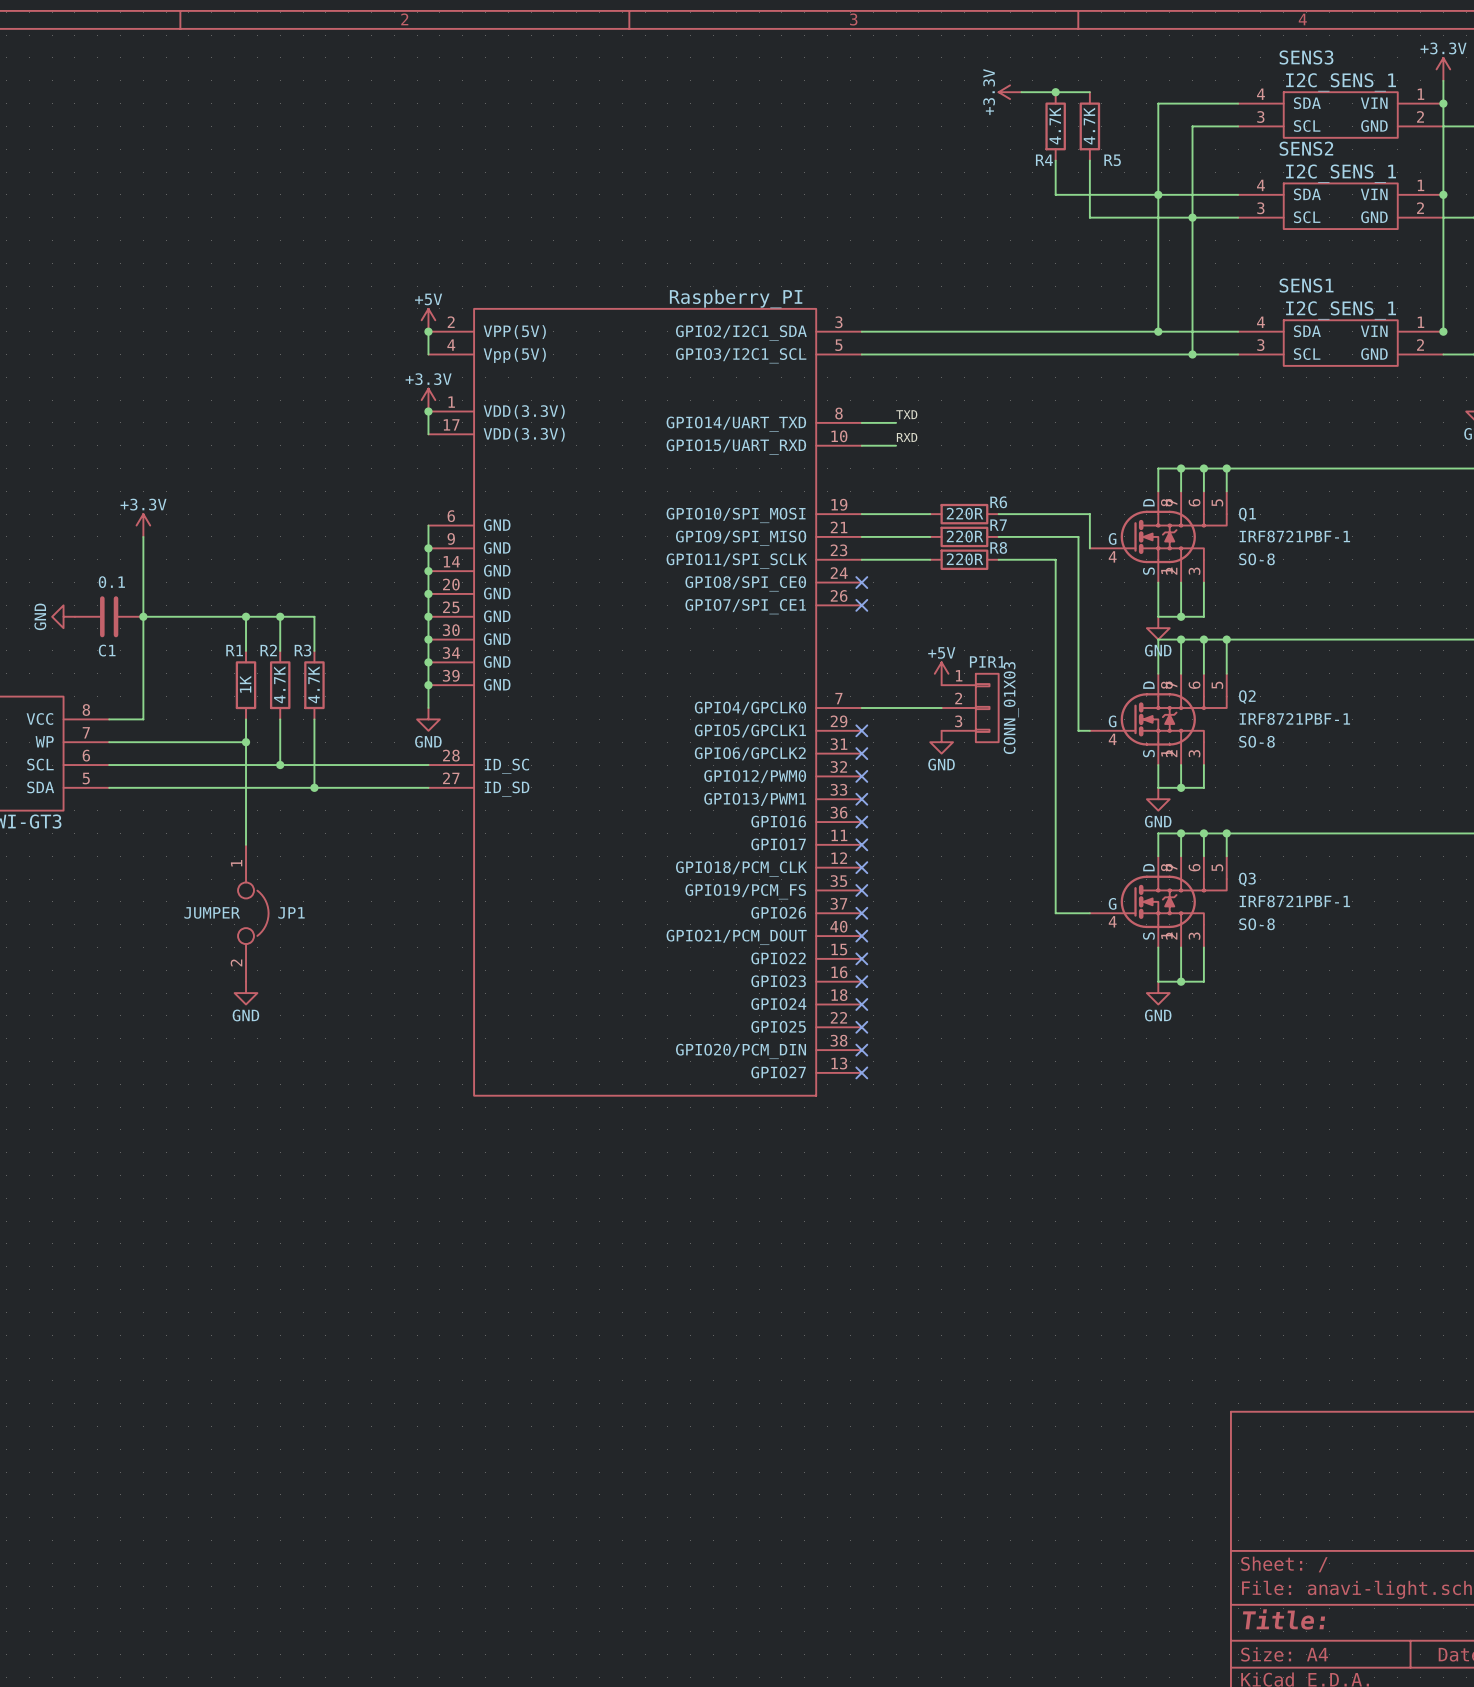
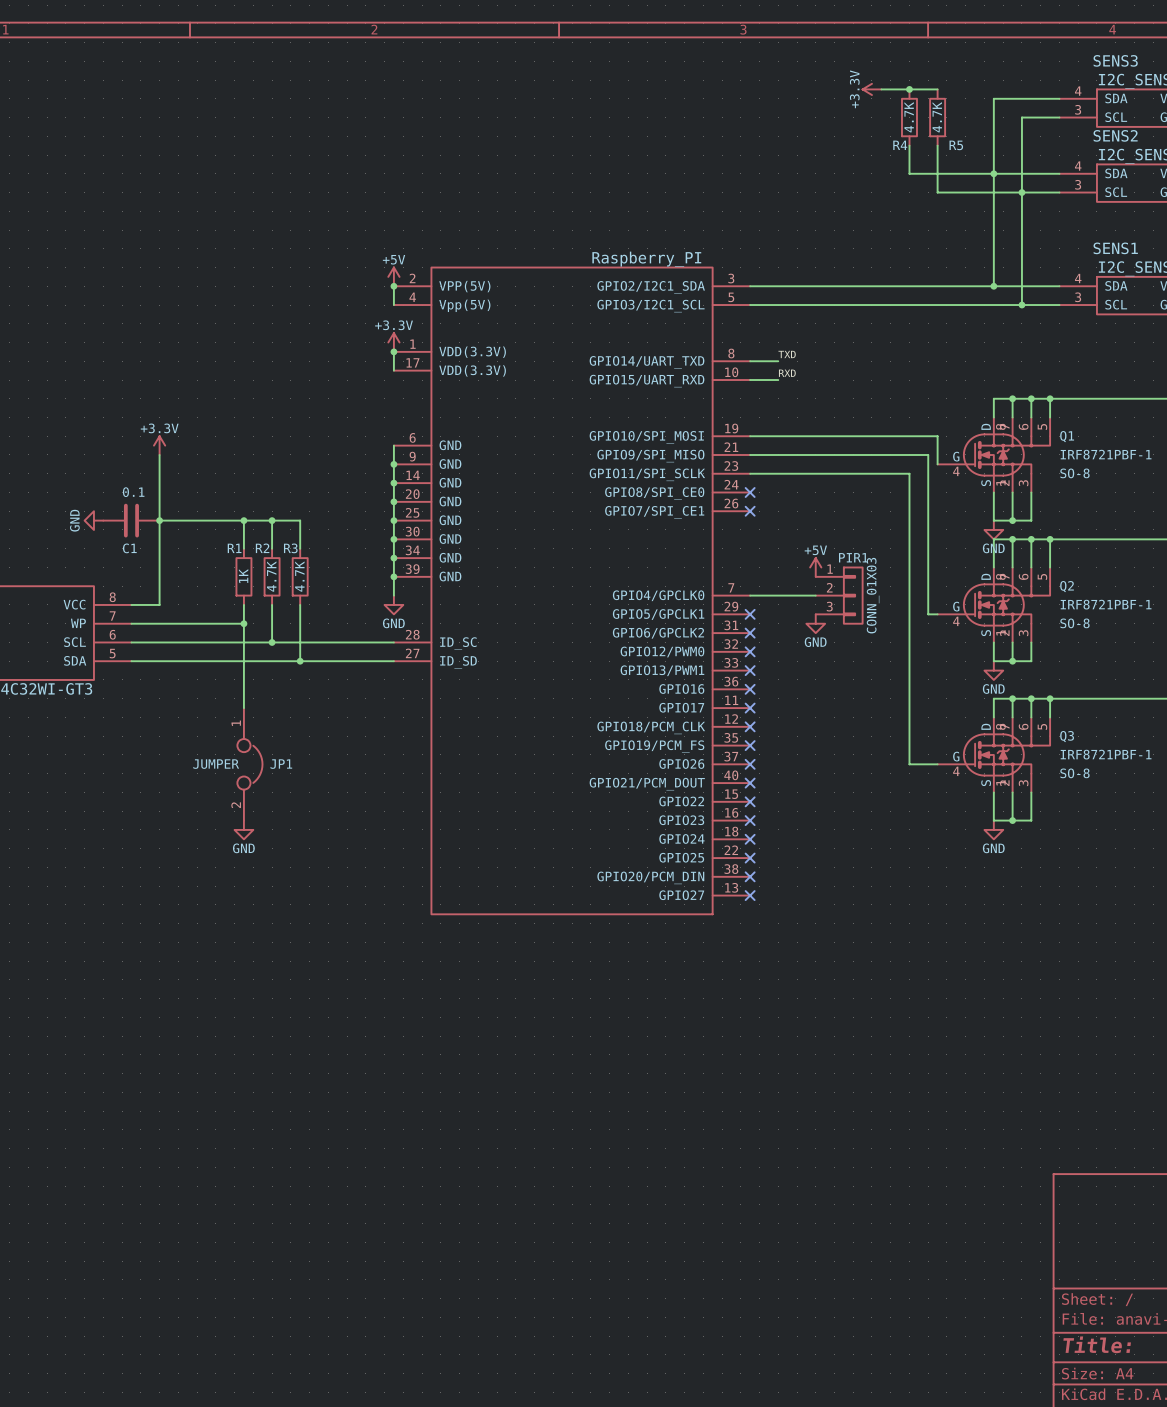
R6: 220R (964, 514) -> none
R7: 220R (964, 536) -> none
R8: 220R (964, 559) -> none

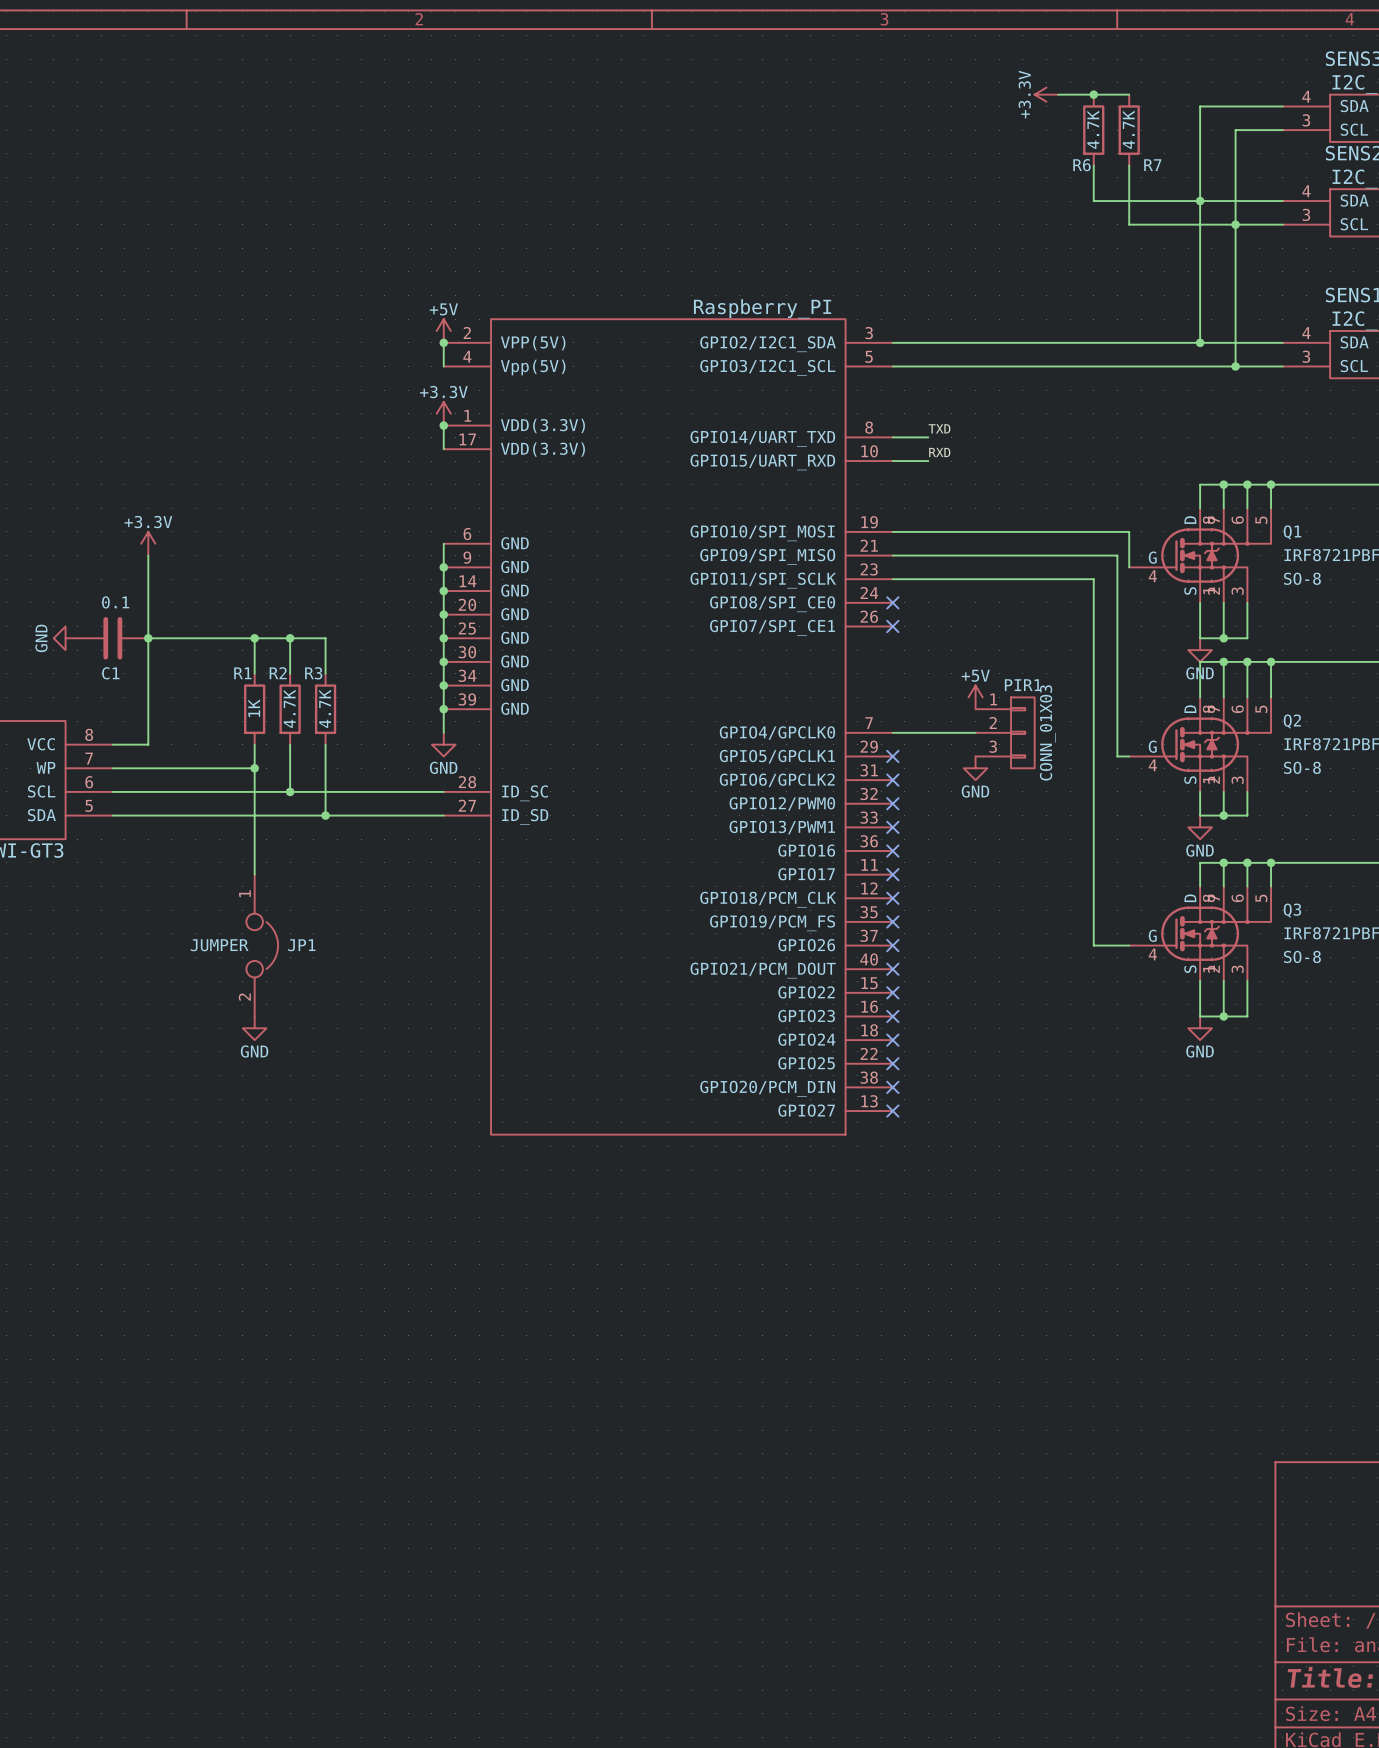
R4 name: R4 (900, 145) -> R6 (1081, 165)
R5 name: R5 (956, 145) -> R7 (1152, 165)

